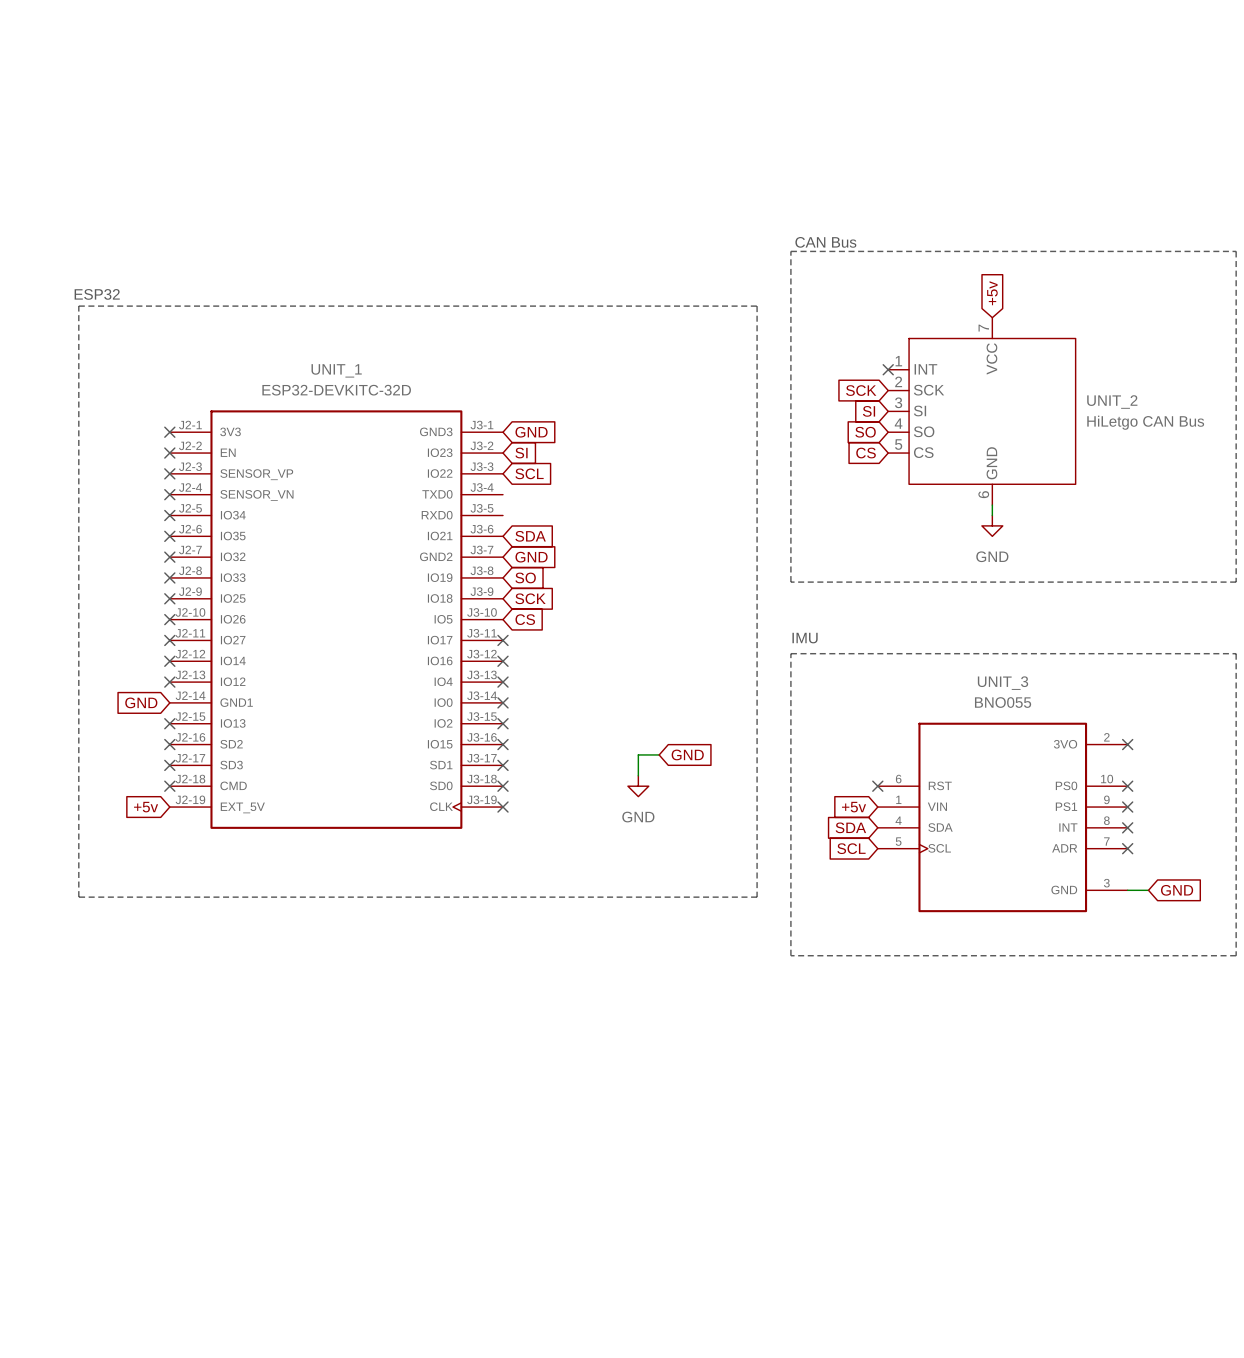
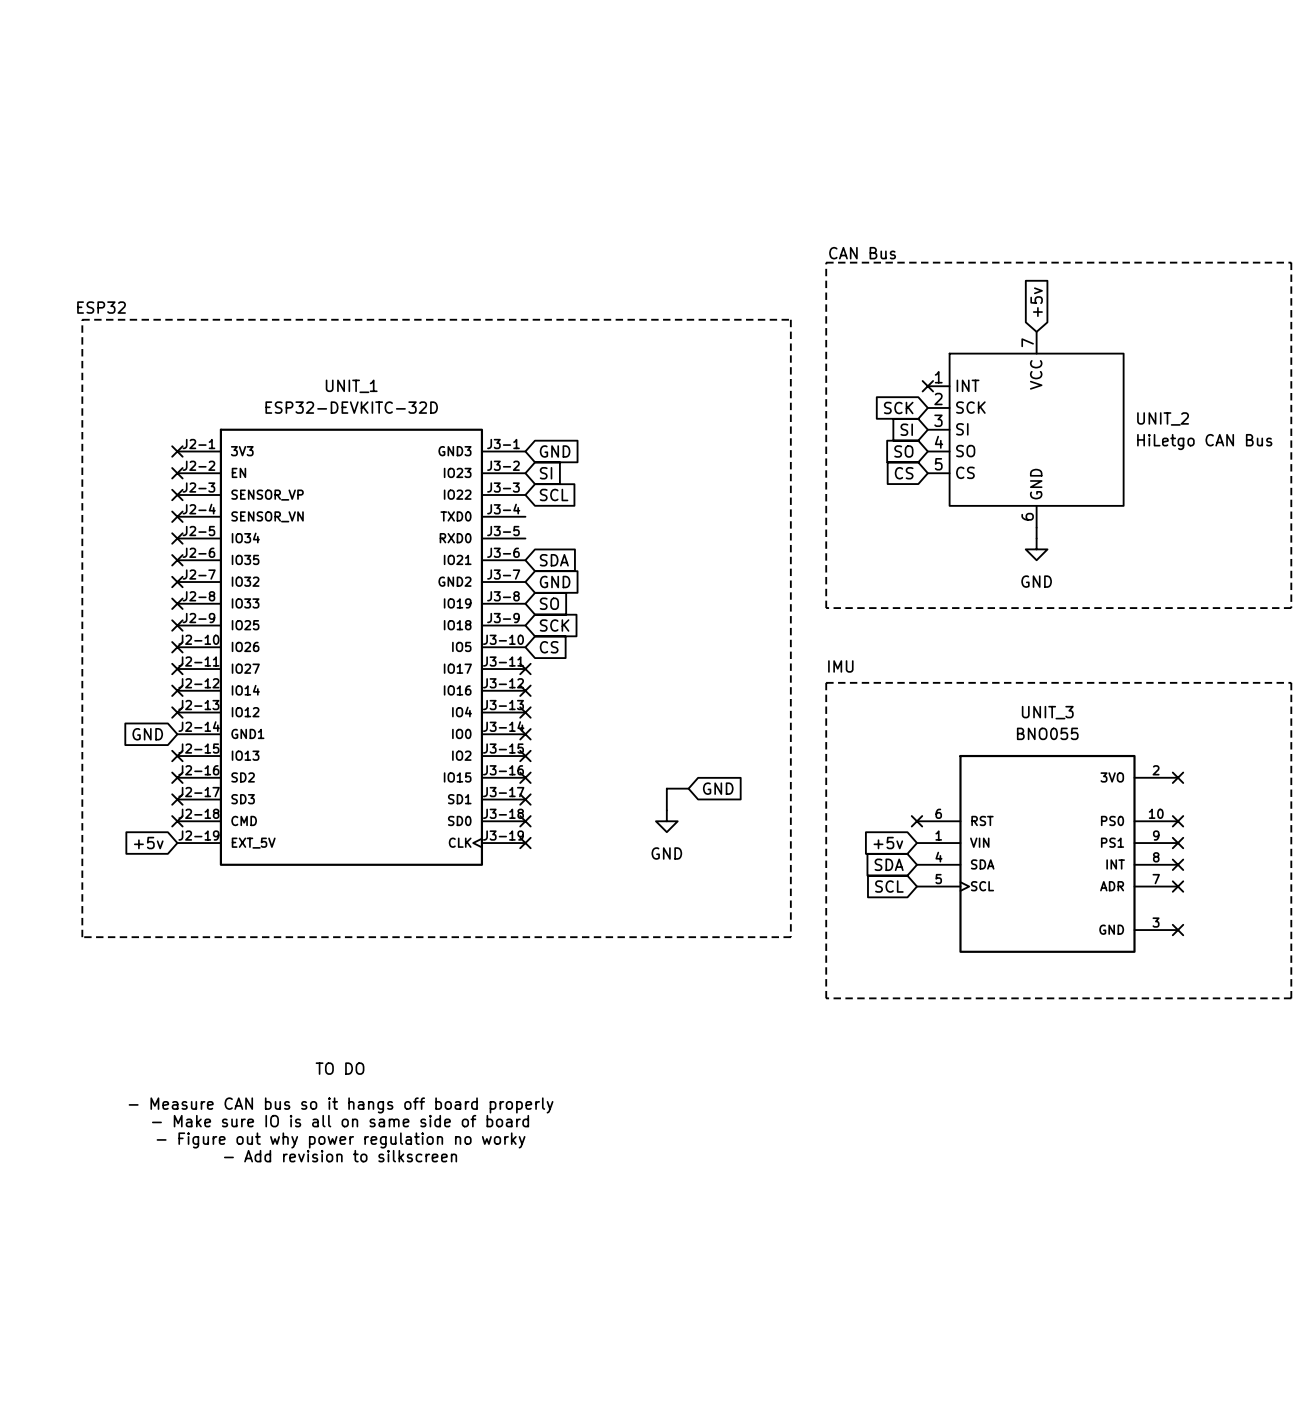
wire: (1127, 890) (1148, 890) -> none
no-connect mark: none -> (1178, 930)
global label: GND (1177, 890) -> none
text: none -> TO DO (340, 1068)
text: none -> - Measure CAN bus so it hangs off board properly (341, 1105)
text: none -> - Make sure IO is all on same side of board (340, 1121)
text: none -> - Figure out why power regulation no worky (341, 1140)
text: none -> - Add revision to silkscreen (340, 1156)

